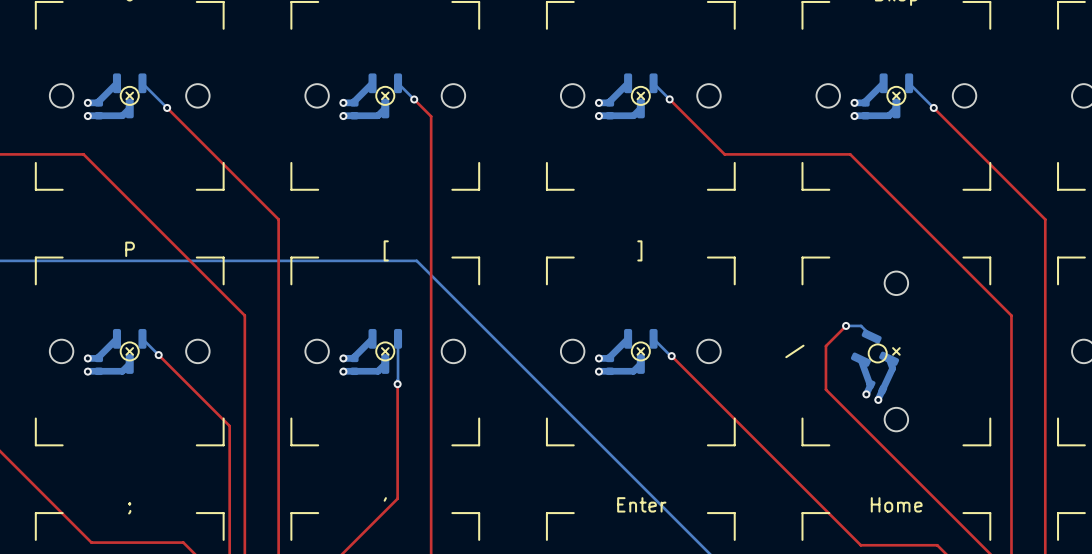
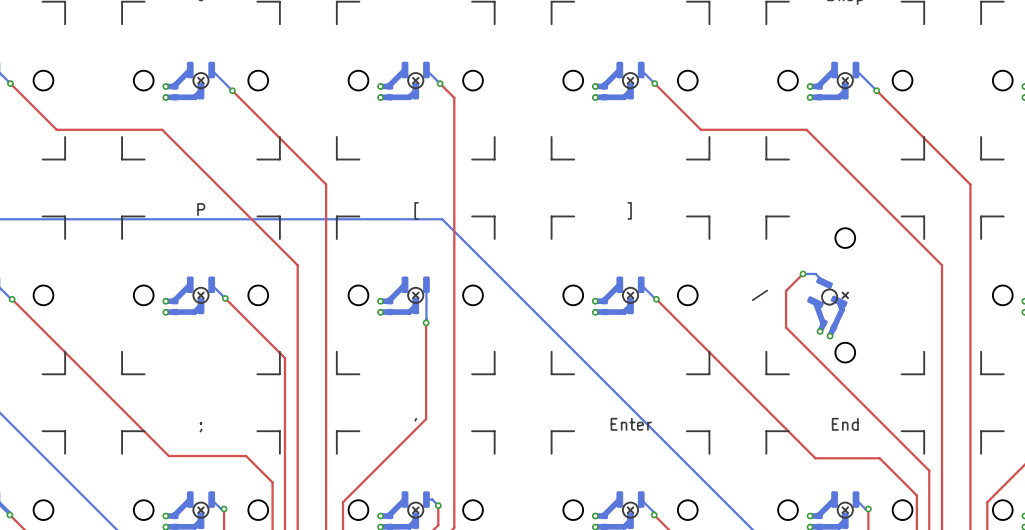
part value: Home (896, 504) -> End (845, 424)

